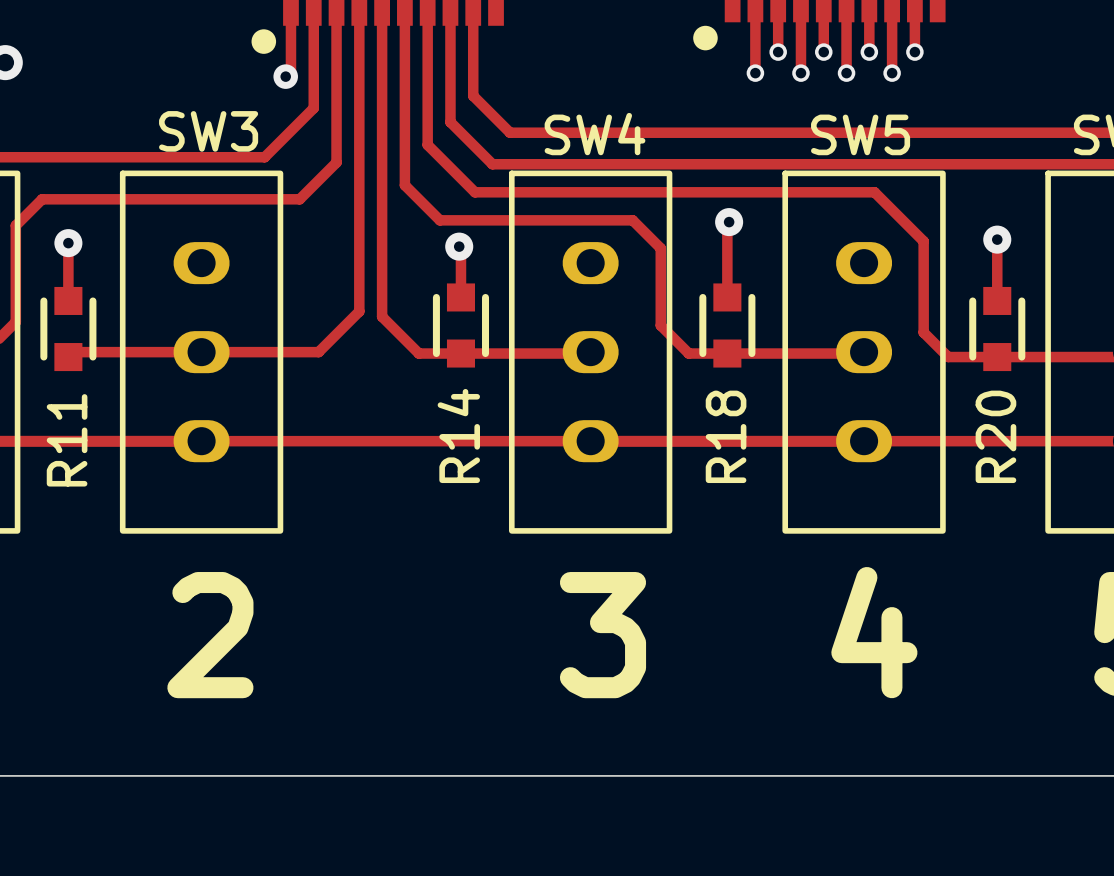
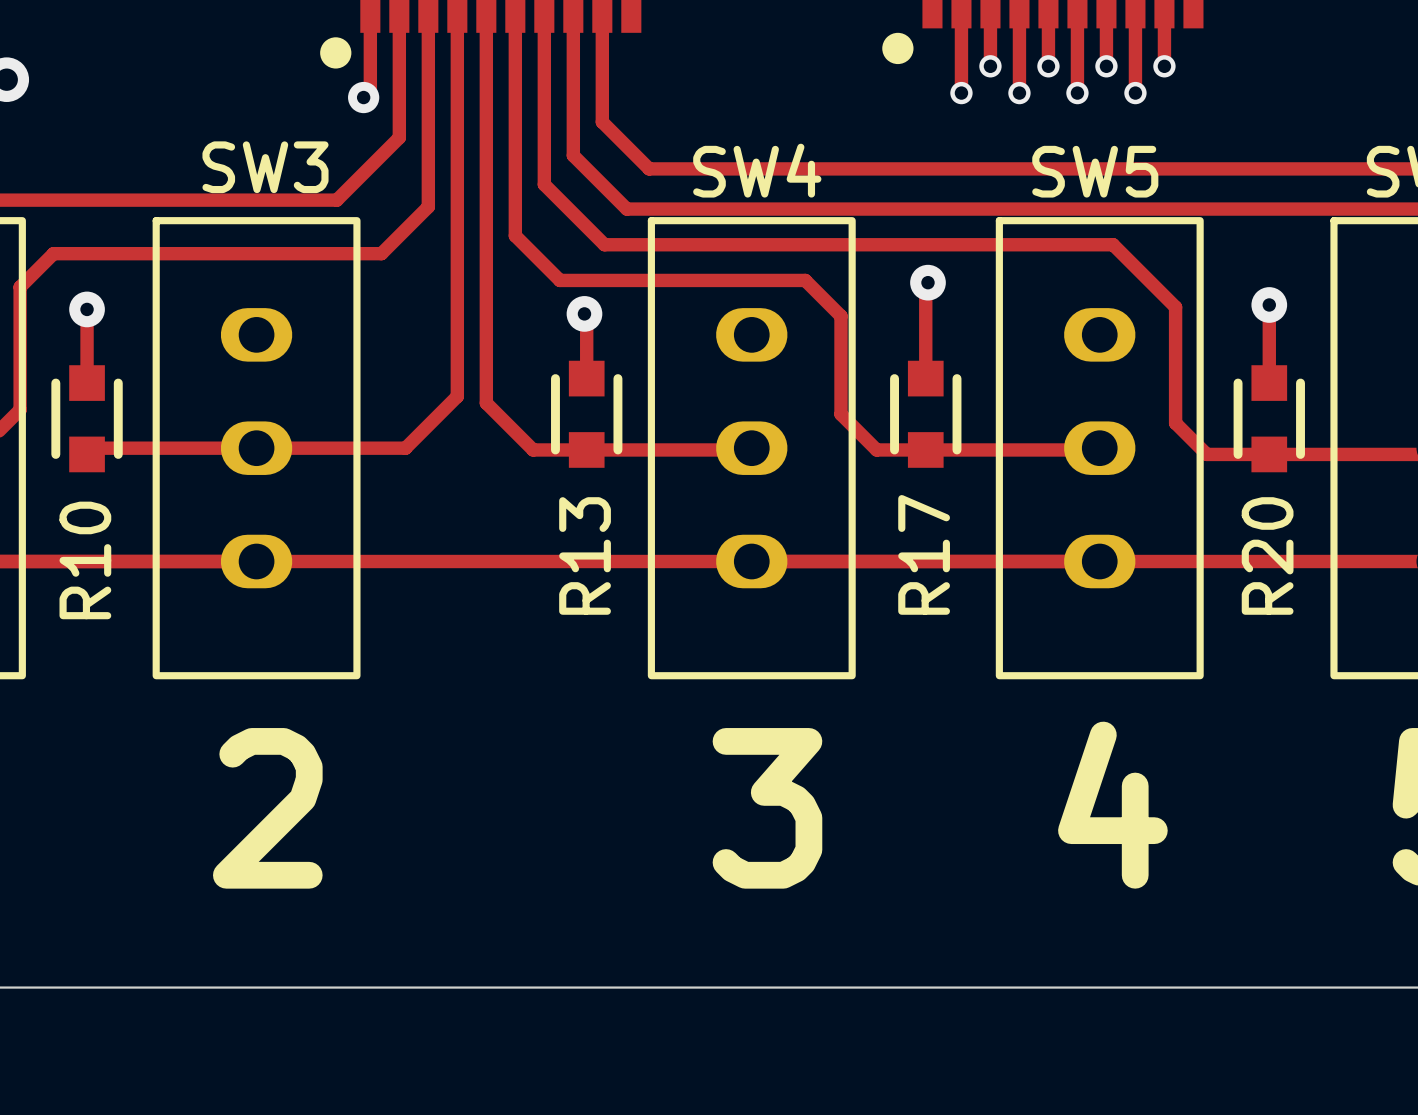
R14 name: R14 (458, 435) -> R13 (585, 555)
R18 name: R18 (726, 436) -> R17 (924, 554)
R11 name: R11 (67, 440) -> R10 (85, 560)

